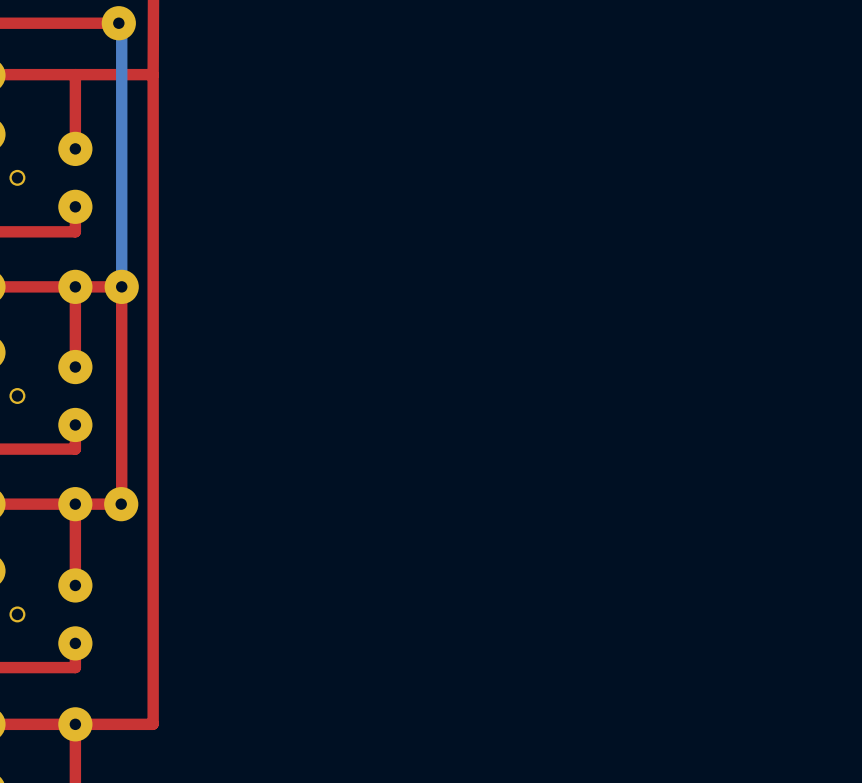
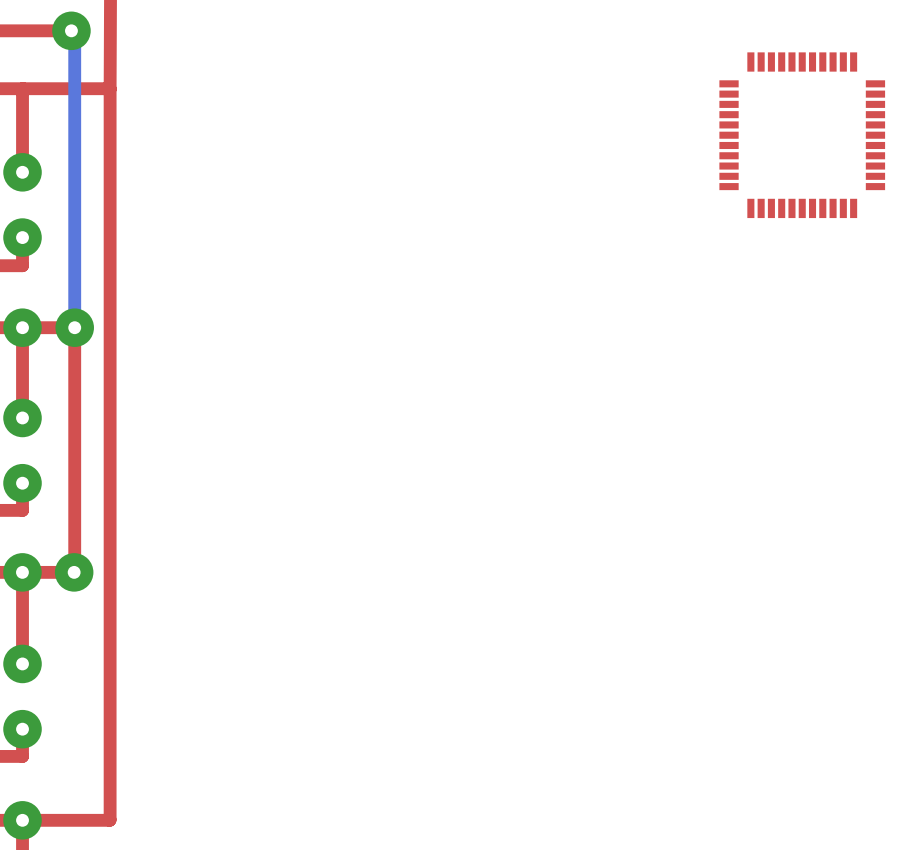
part: none -> (802, 135)

